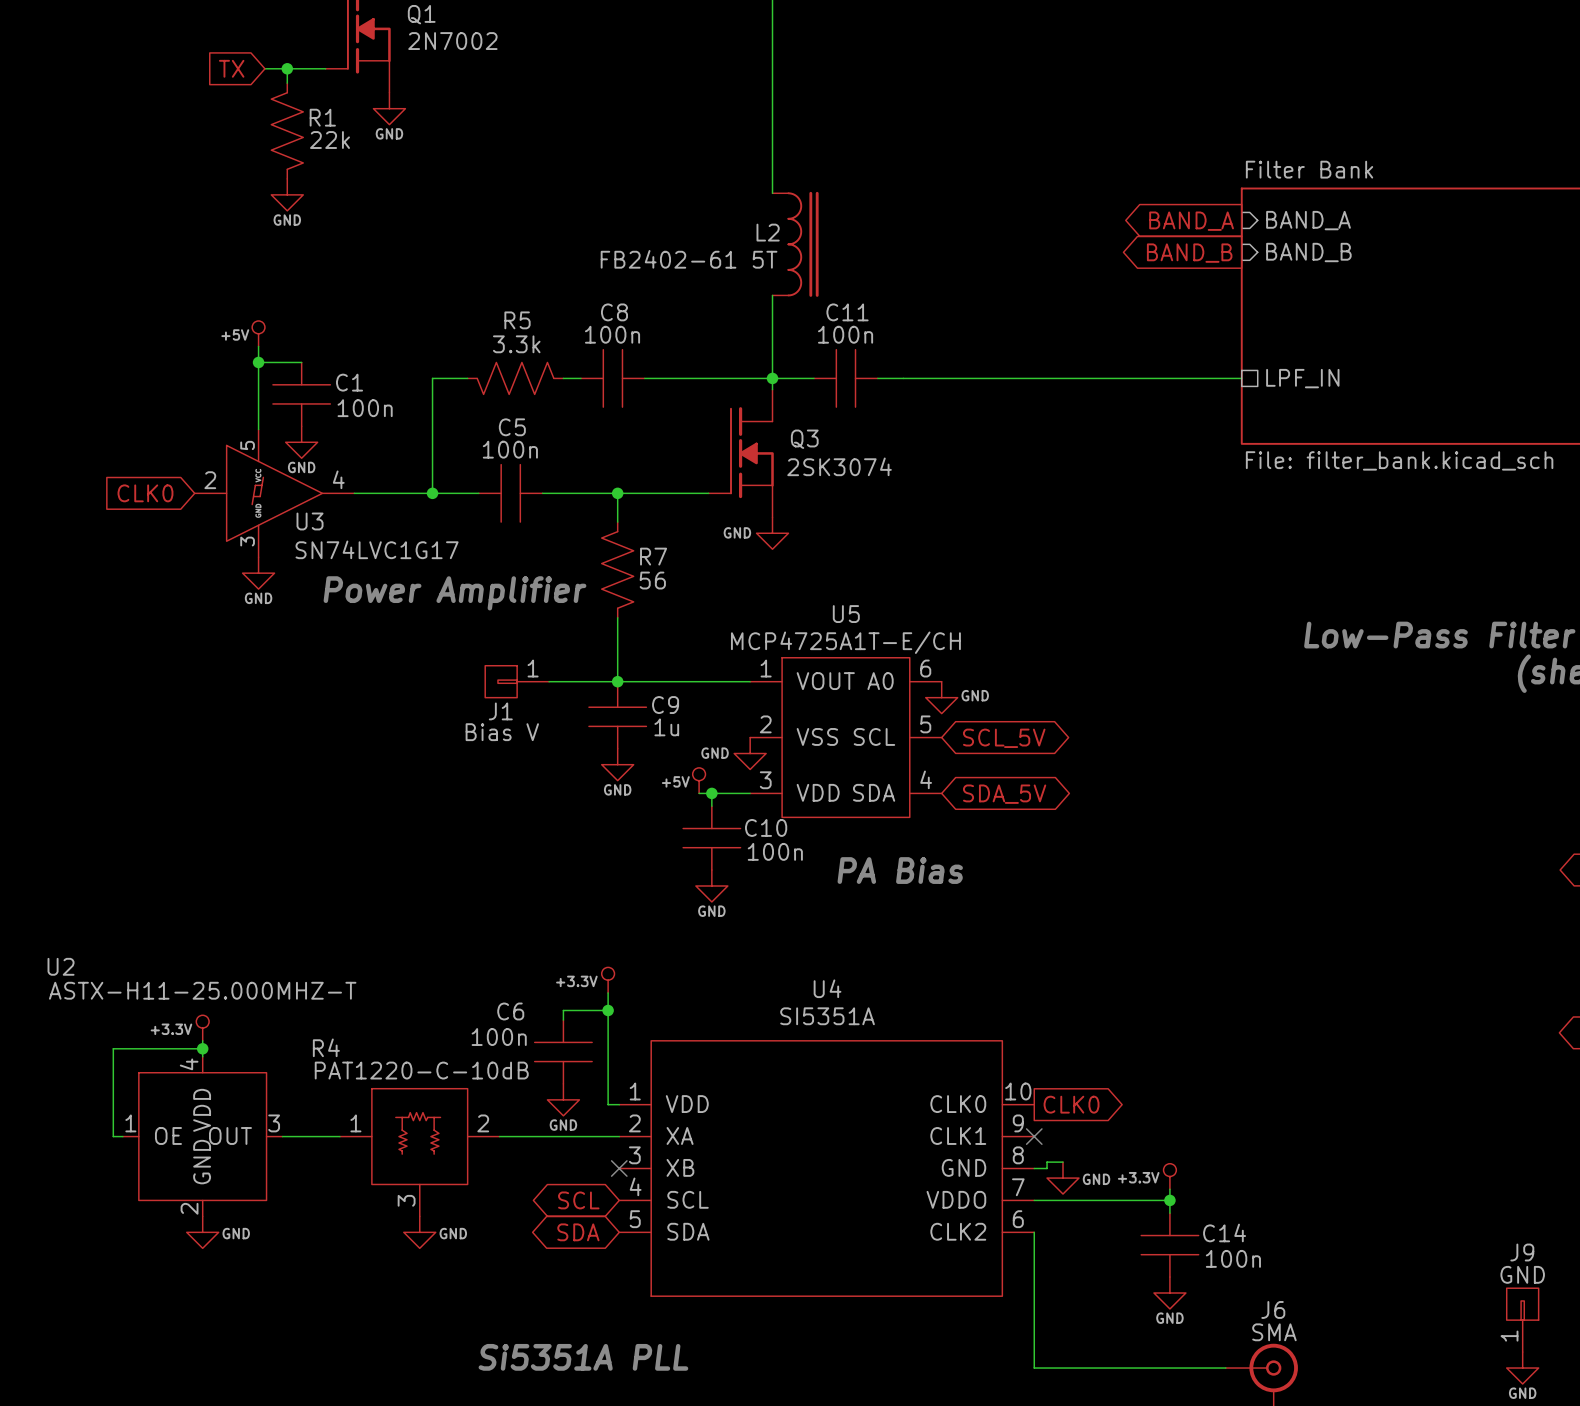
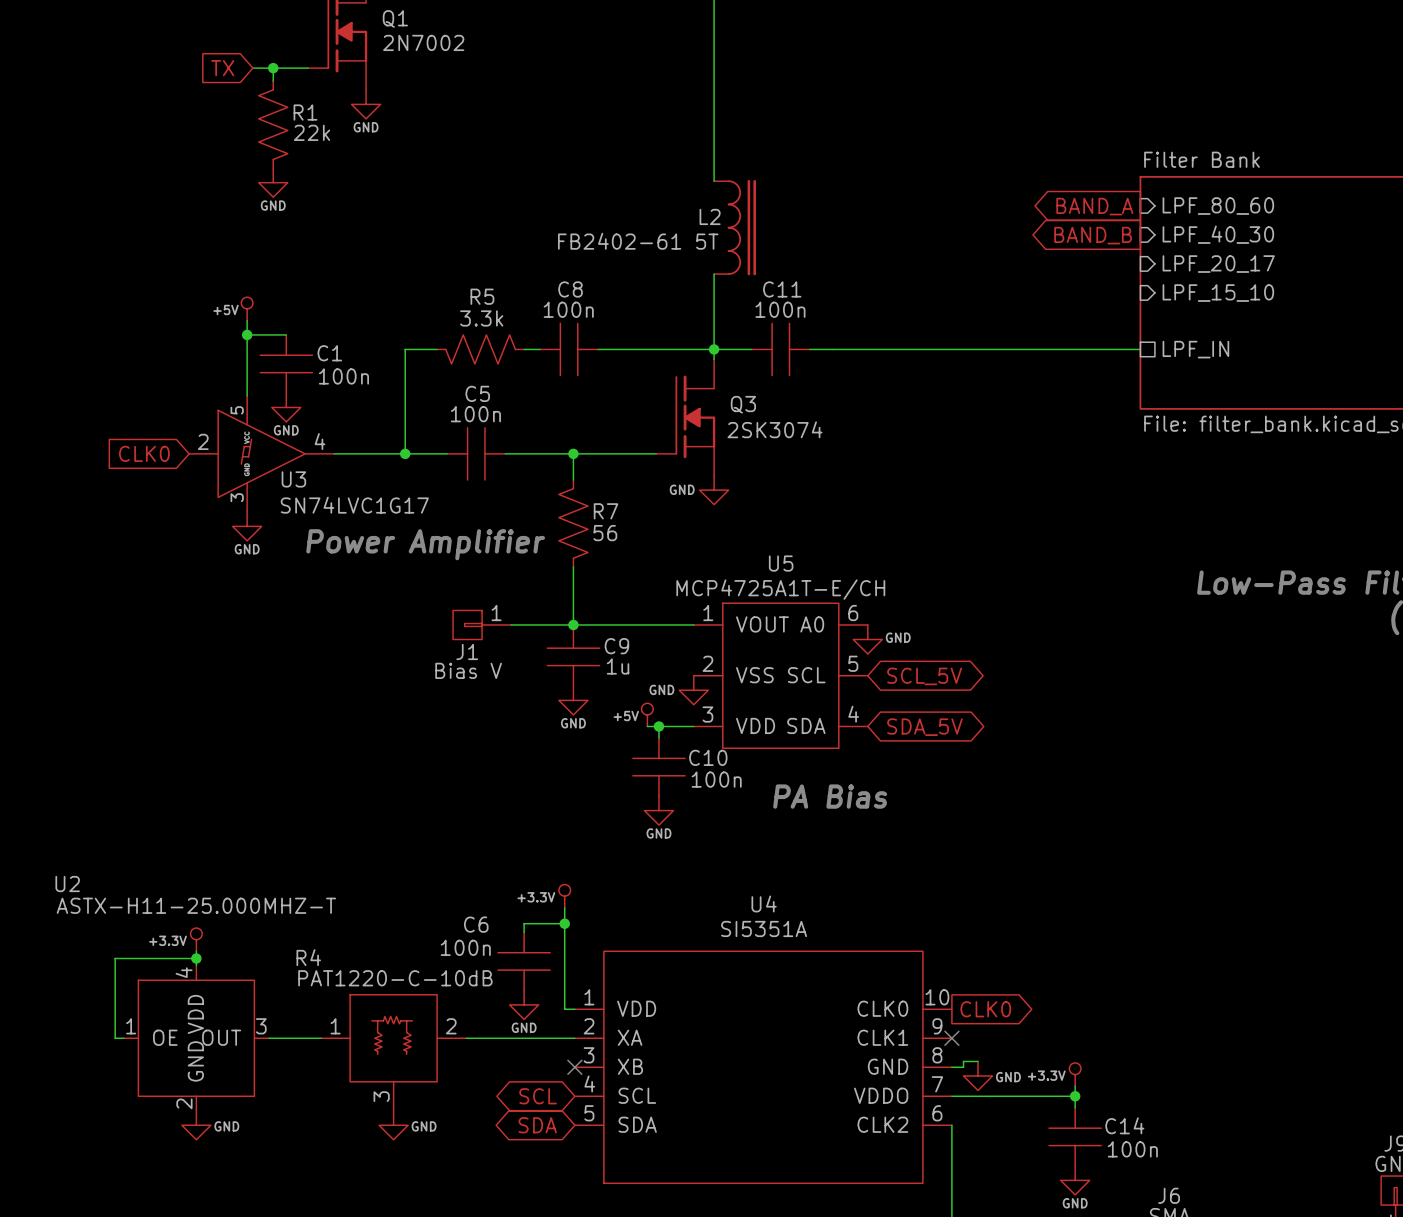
sheet pin: BAND_A (1308, 220) -> LPF_80_60 (1218, 206)
sheet pin: BAND_B (1308, 252) -> LPF_40_30 (1218, 234)
sheet pin: none -> LPF_20_17 (1218, 264)
sheet pin: none -> LPF_15_10 (1218, 293)

